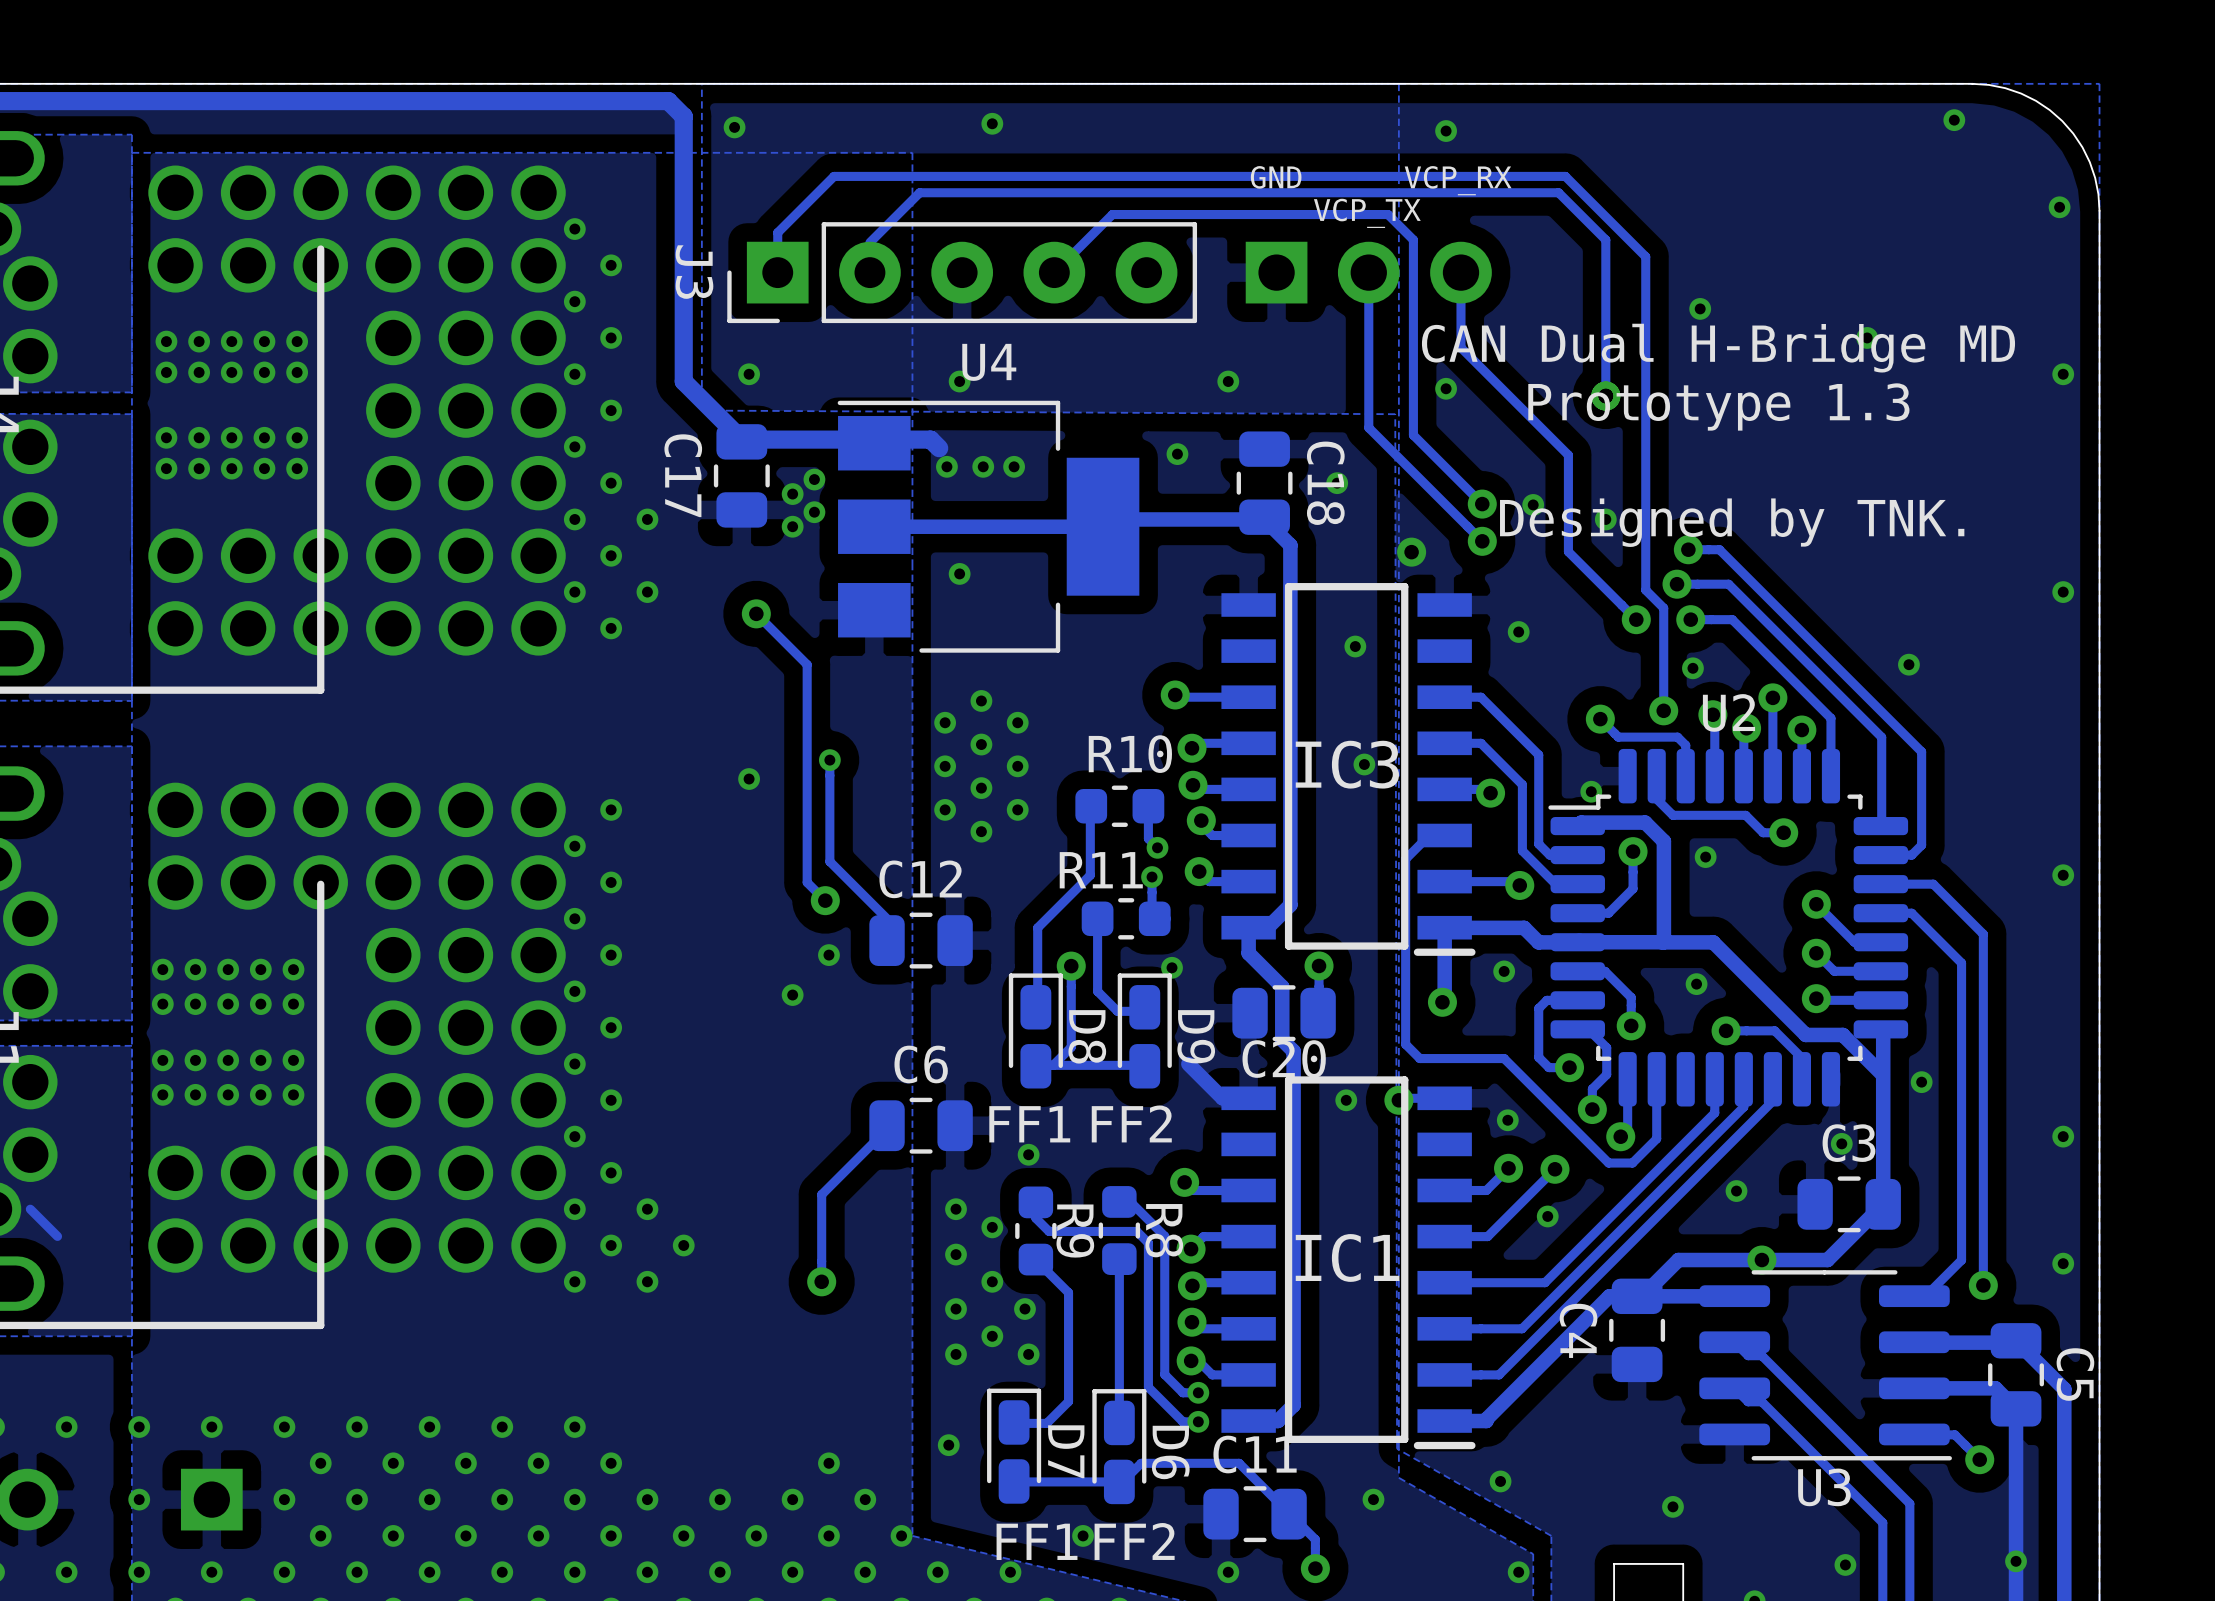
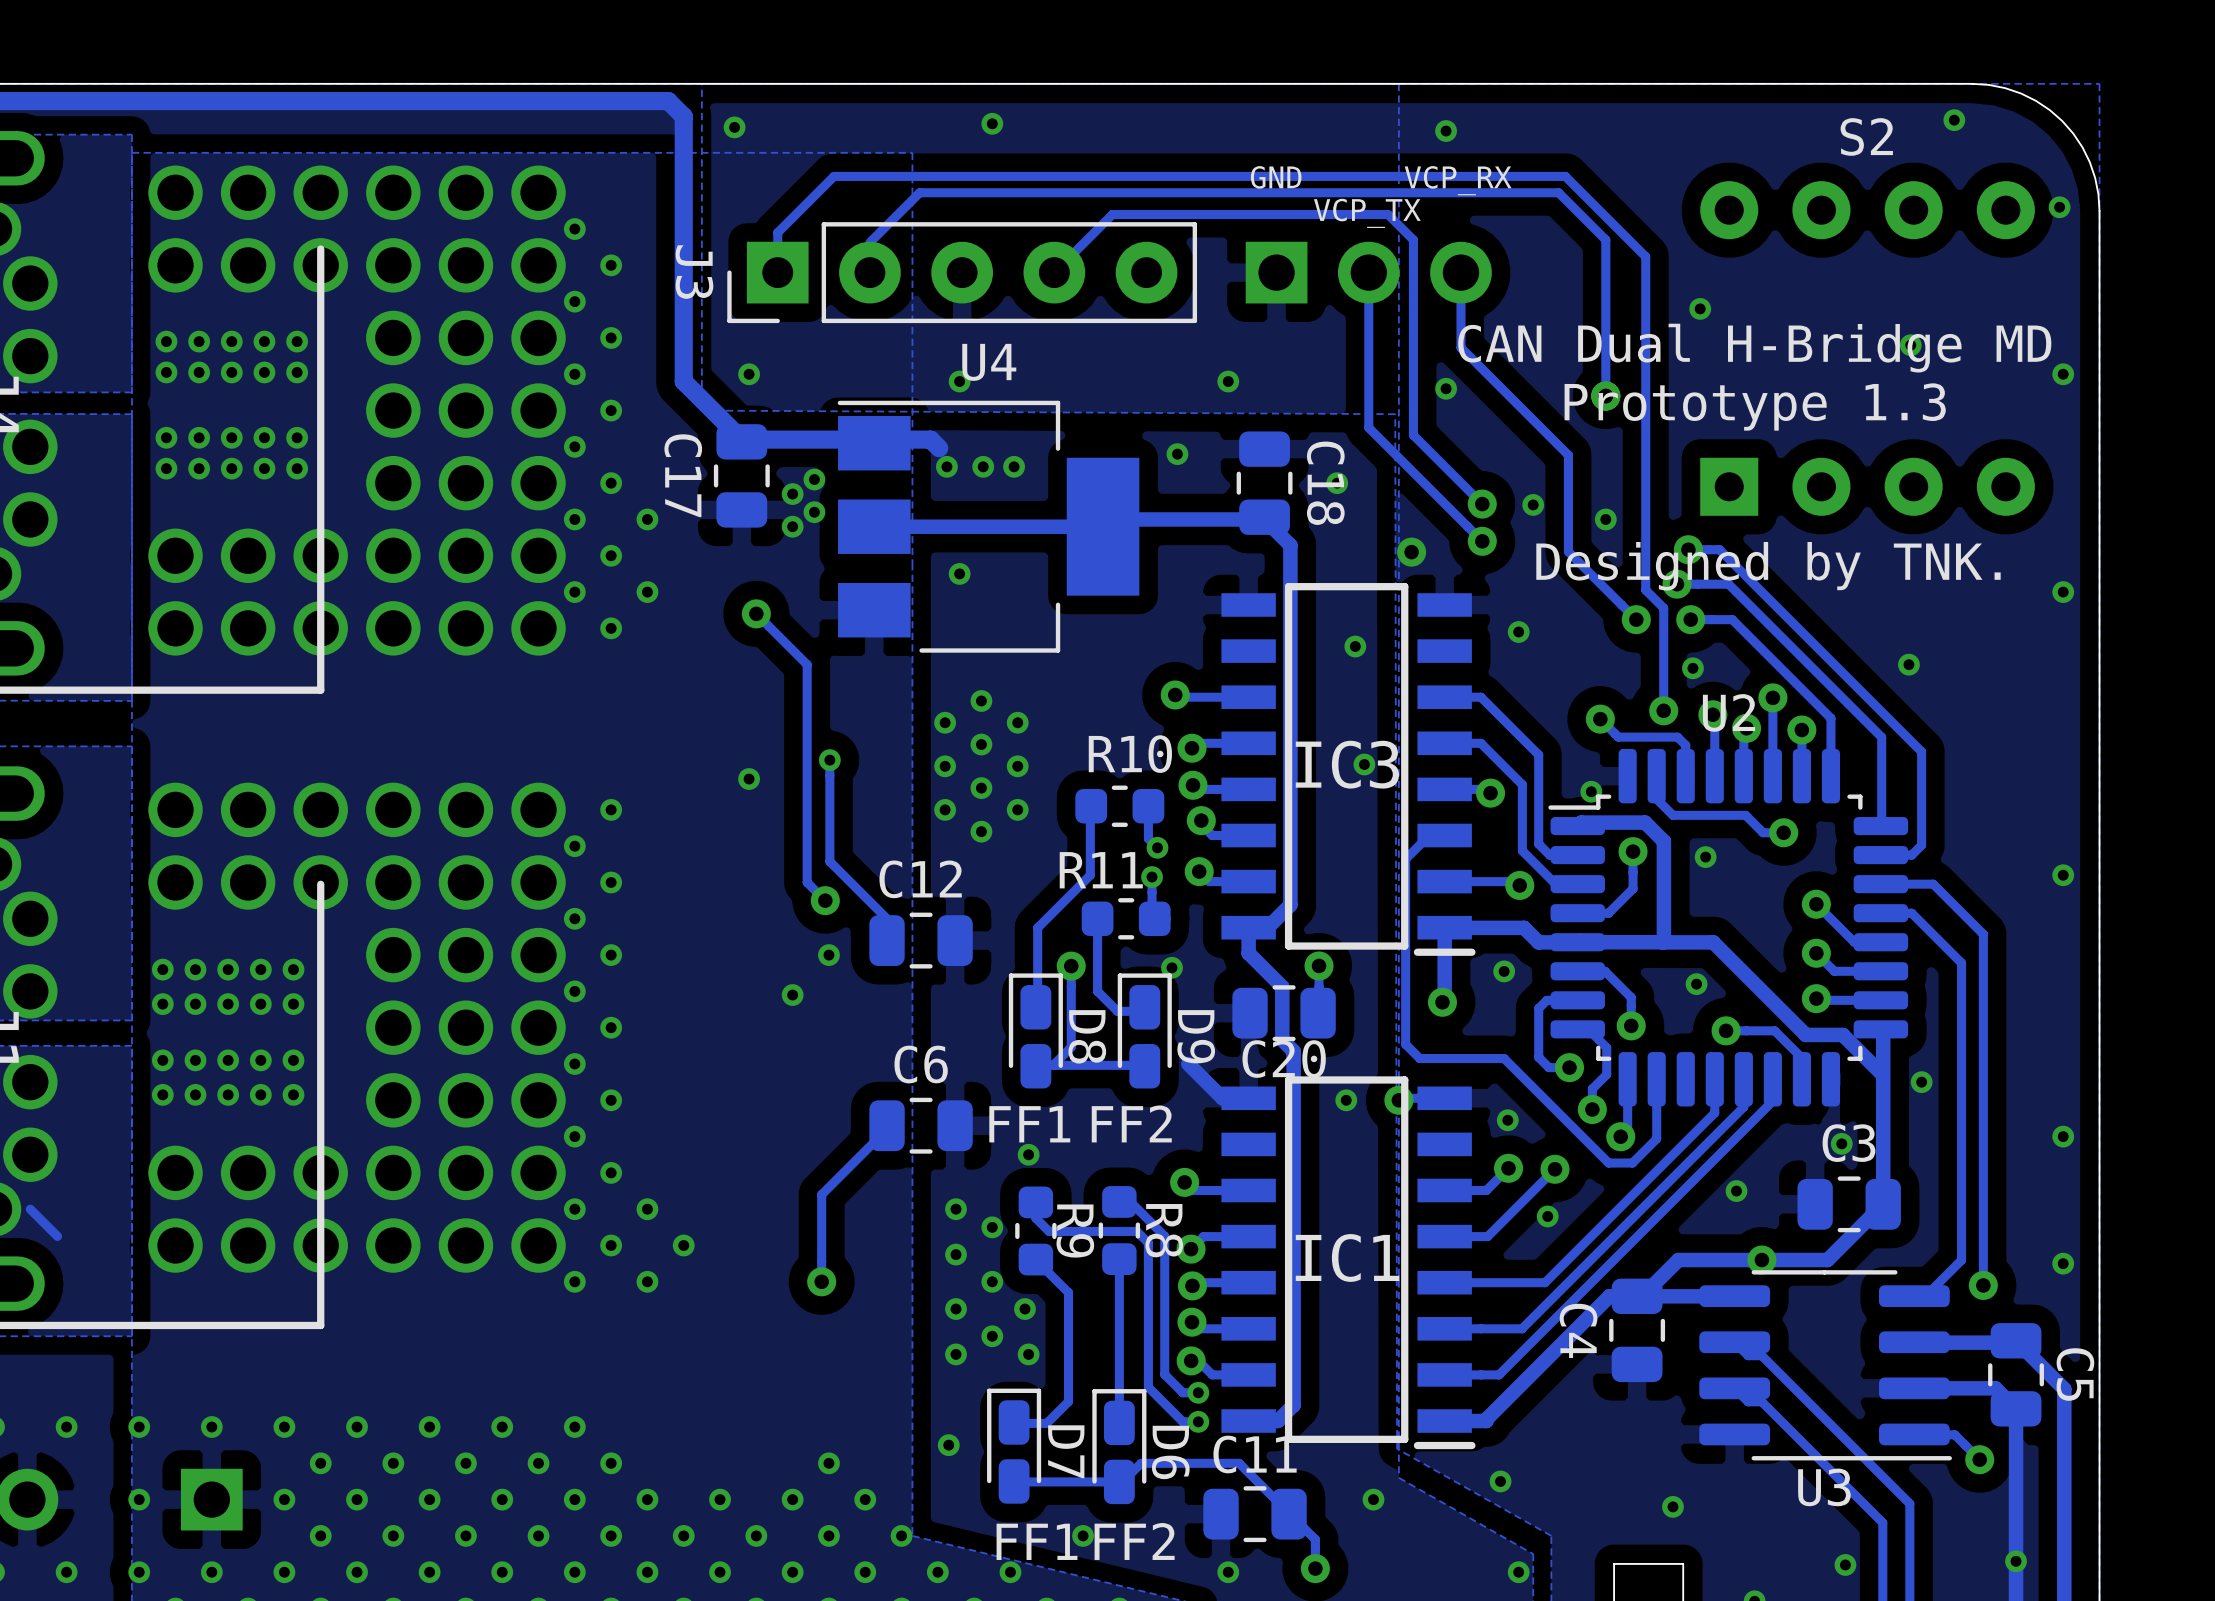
via position: (1867, 337) -> (1910, 345)
text position: CAN Dual H-Bridge MD (1718, 348) -> CAN Dual H-Bridge MD (1754, 348)
S2: none -> (1867, 348)
text position: Prototype 1.3 (1718, 406) -> Prototype 1.3 (1755, 406)
text position: Designed by TNK. (1732, 522) -> Designed by TNK. (1768, 566)

